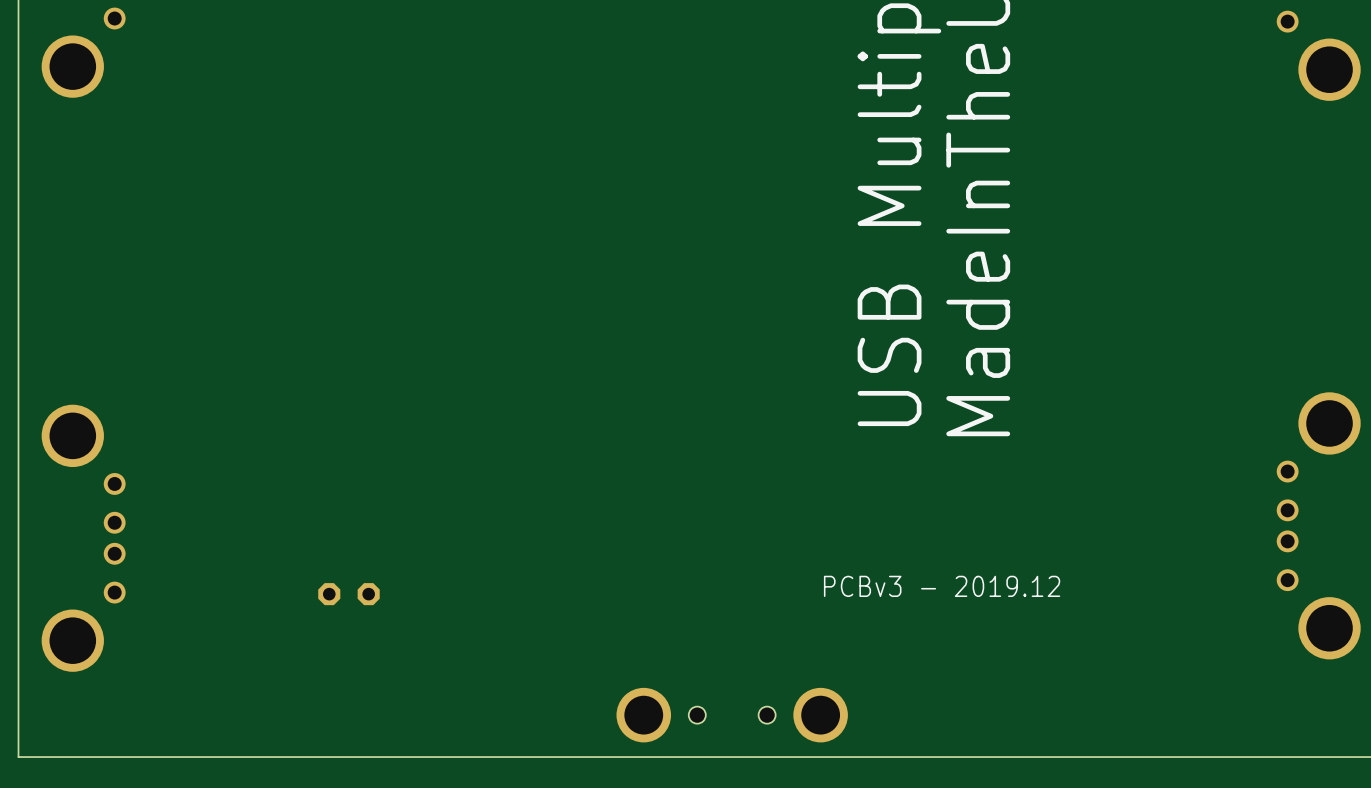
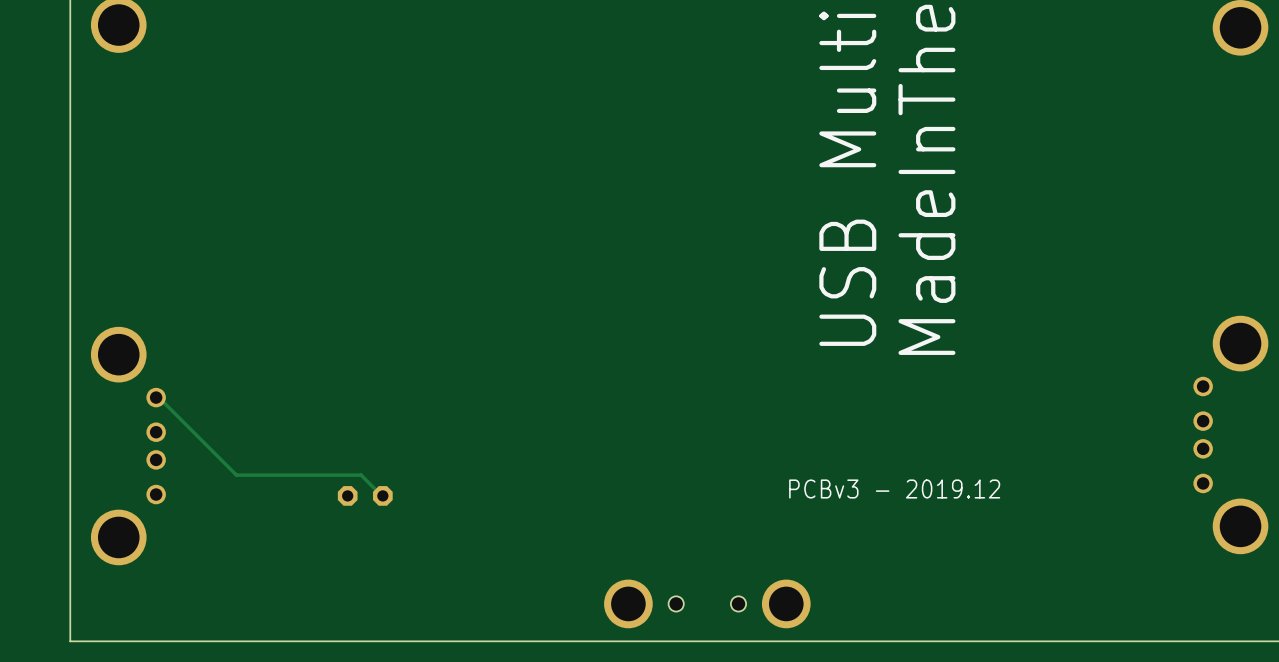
track: none -> (156, 397) (160, 398) (236, 475) (361, 475) (382, 495)

